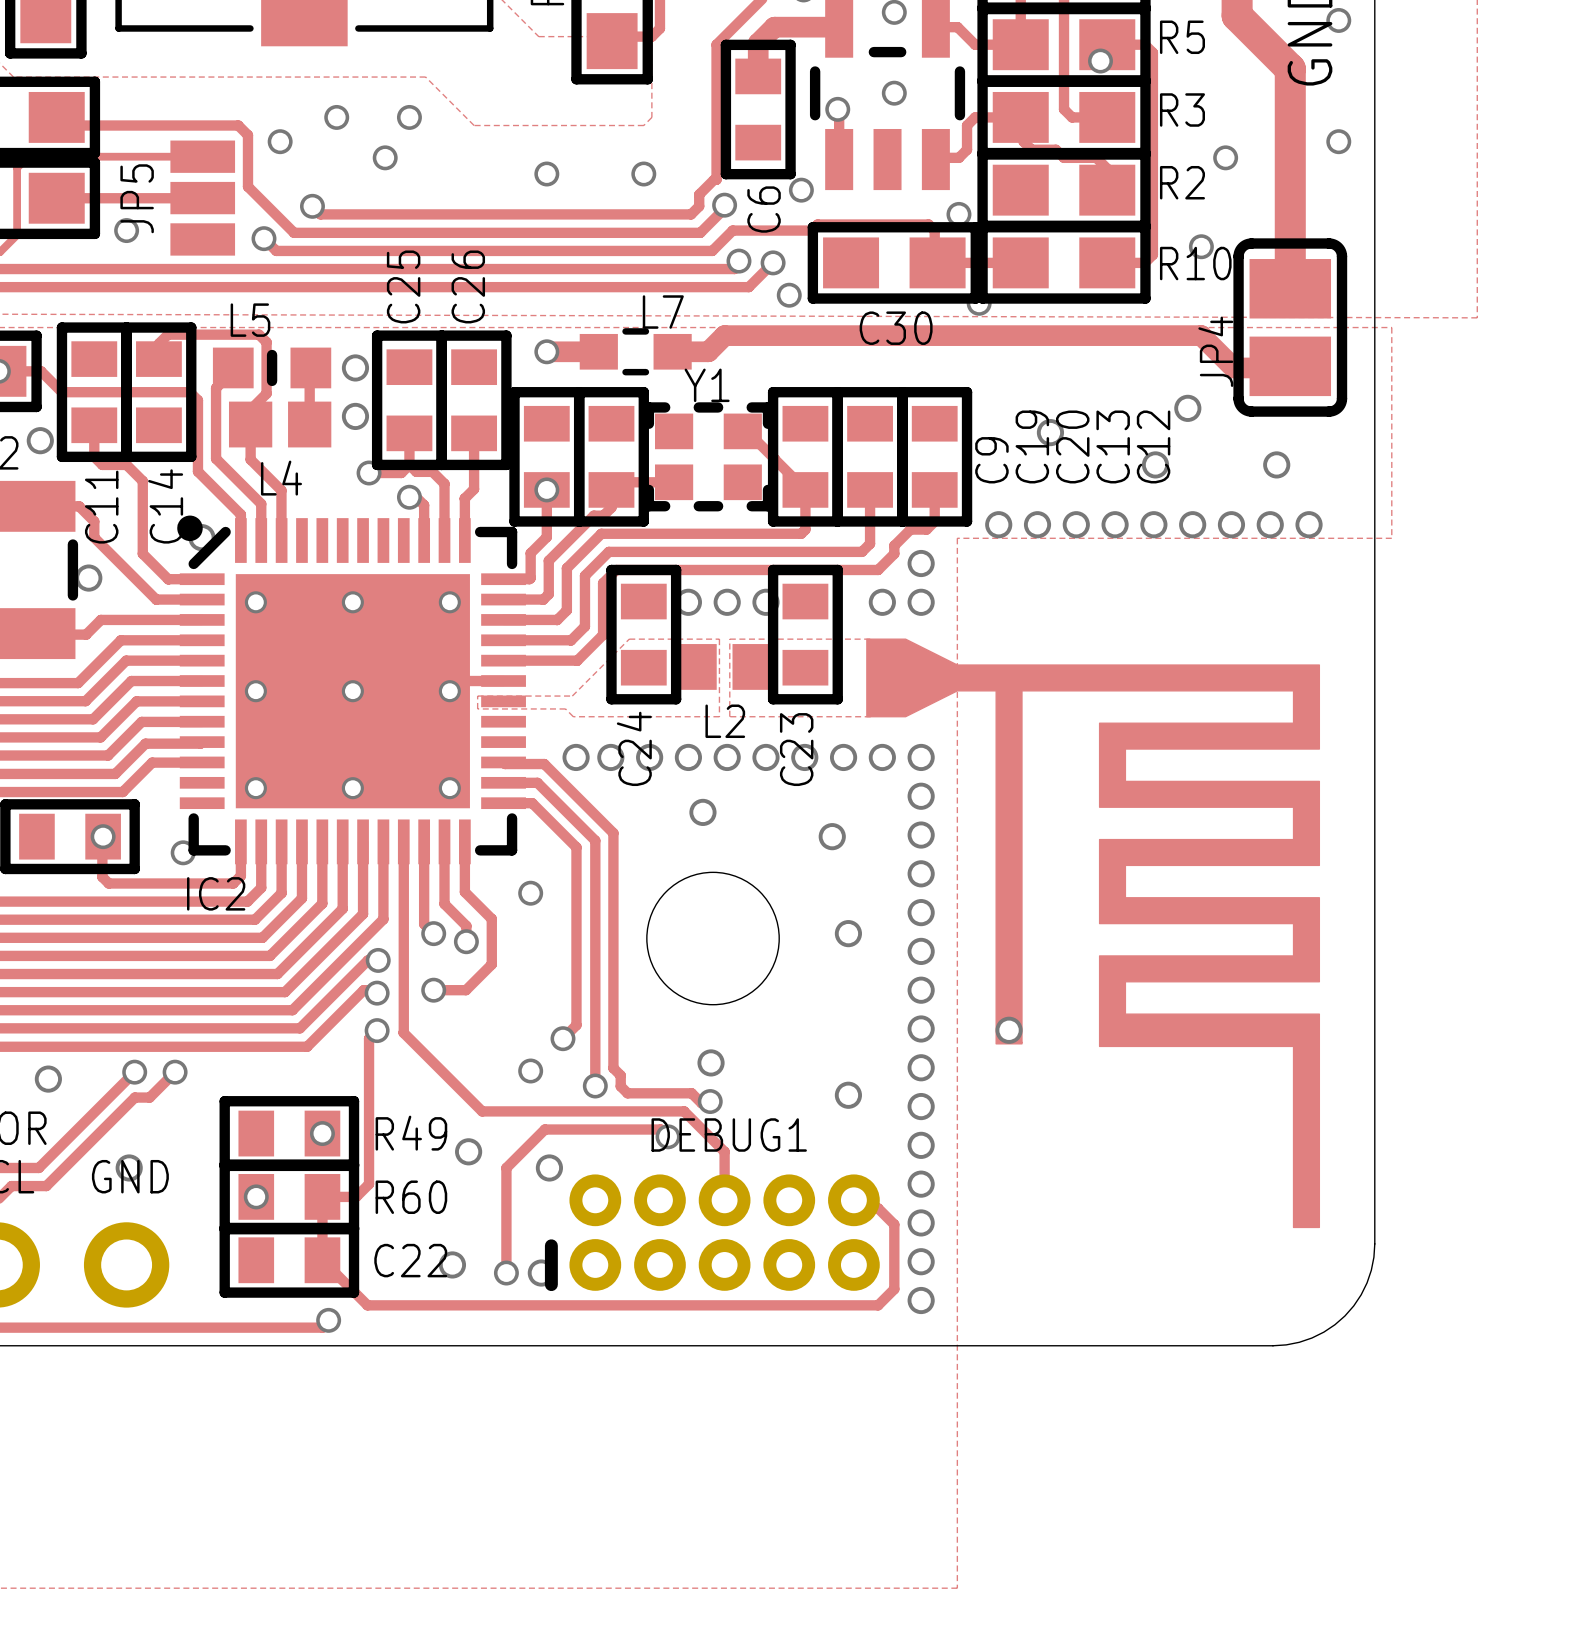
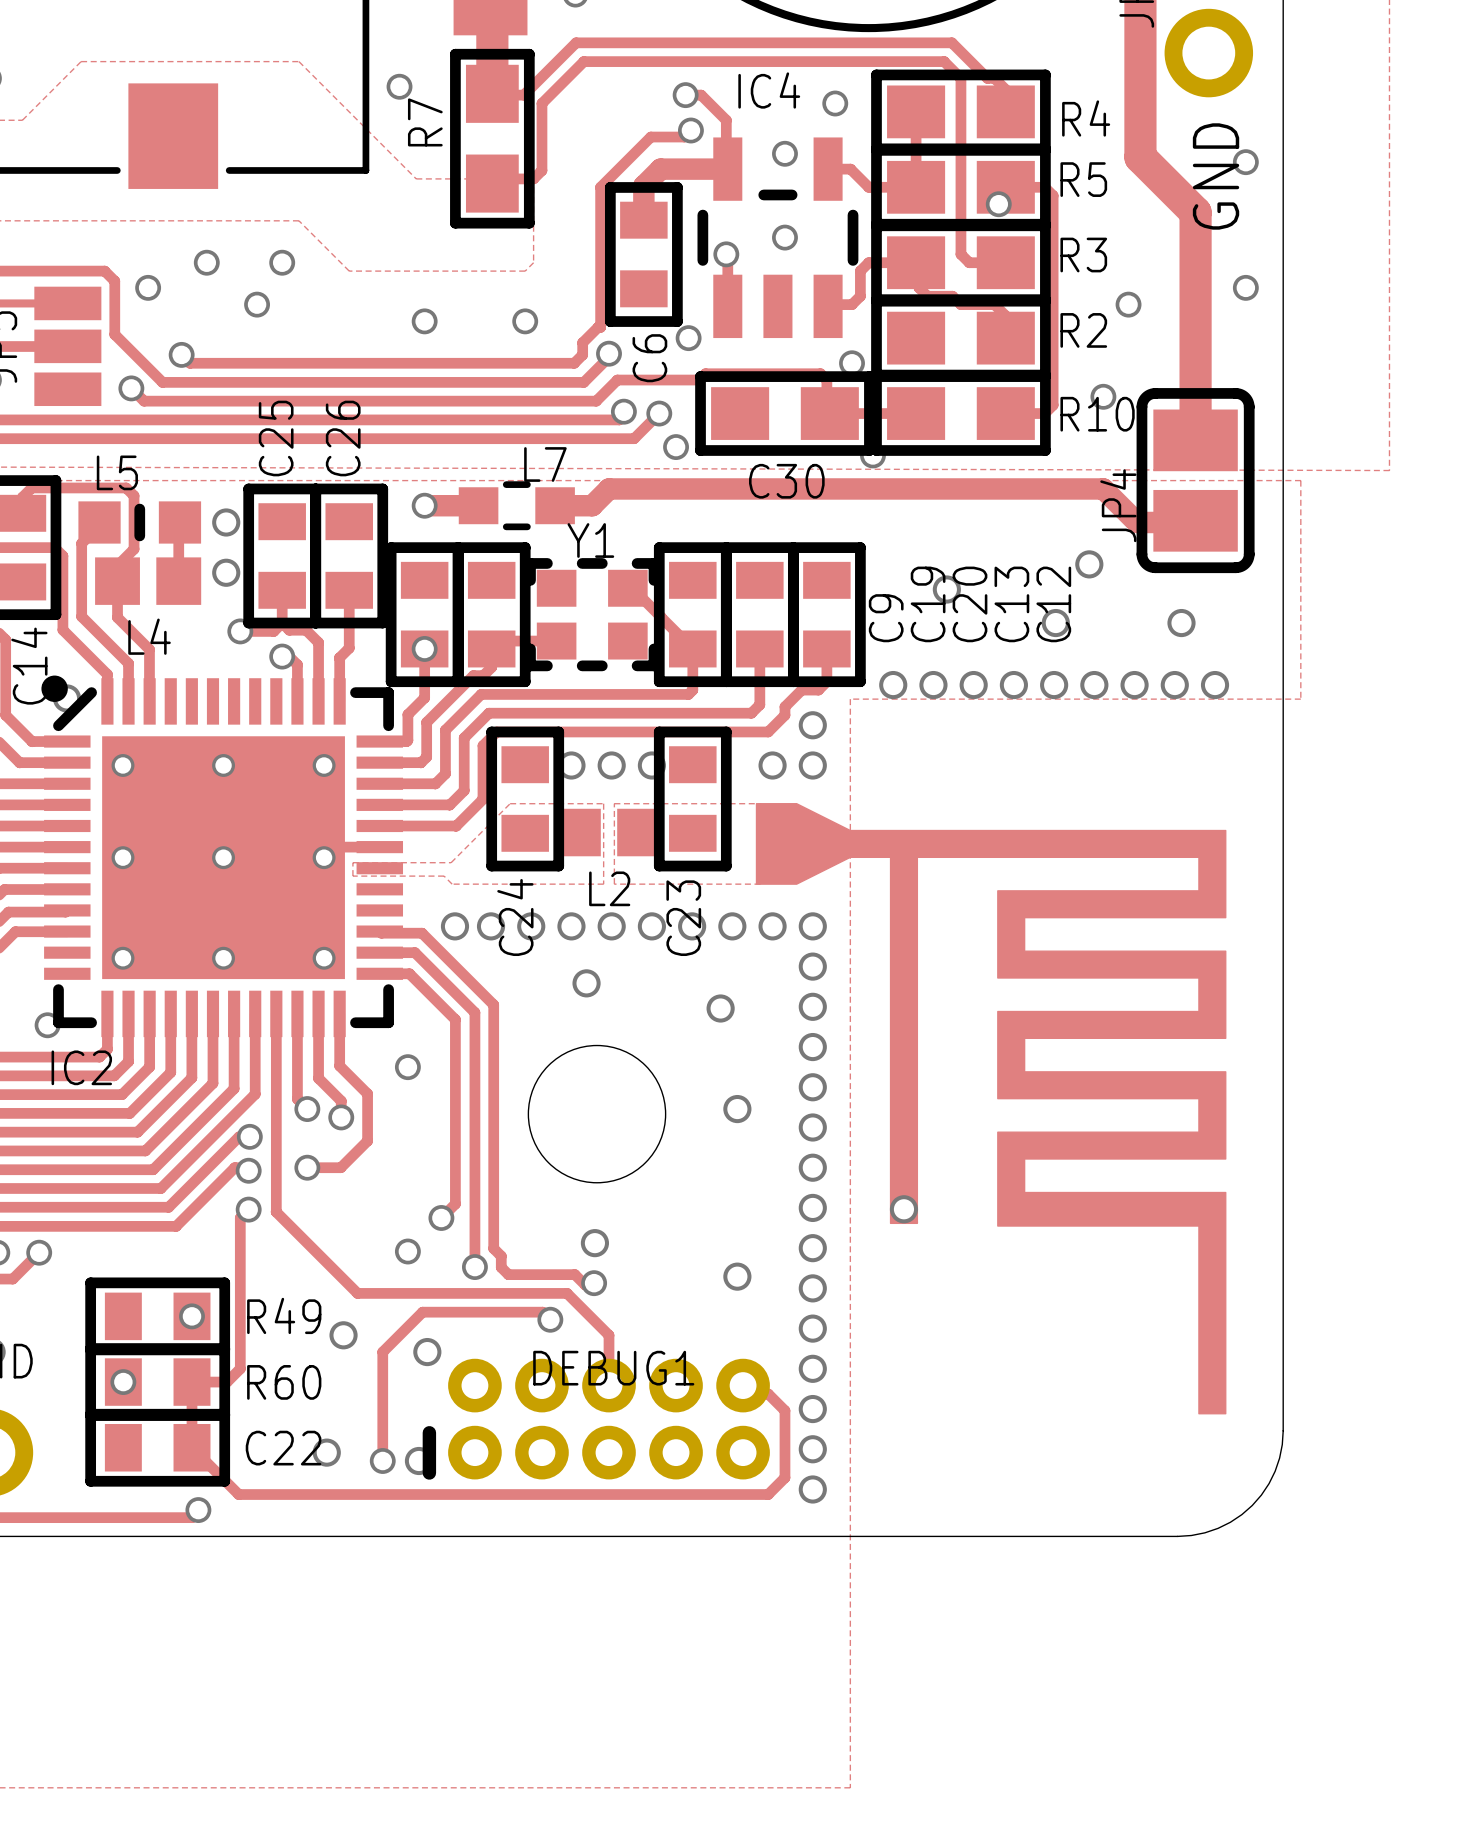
DEBUG1 name position: DEBUG1 (729, 1135) -> DEBUG1 (613, 1368)

